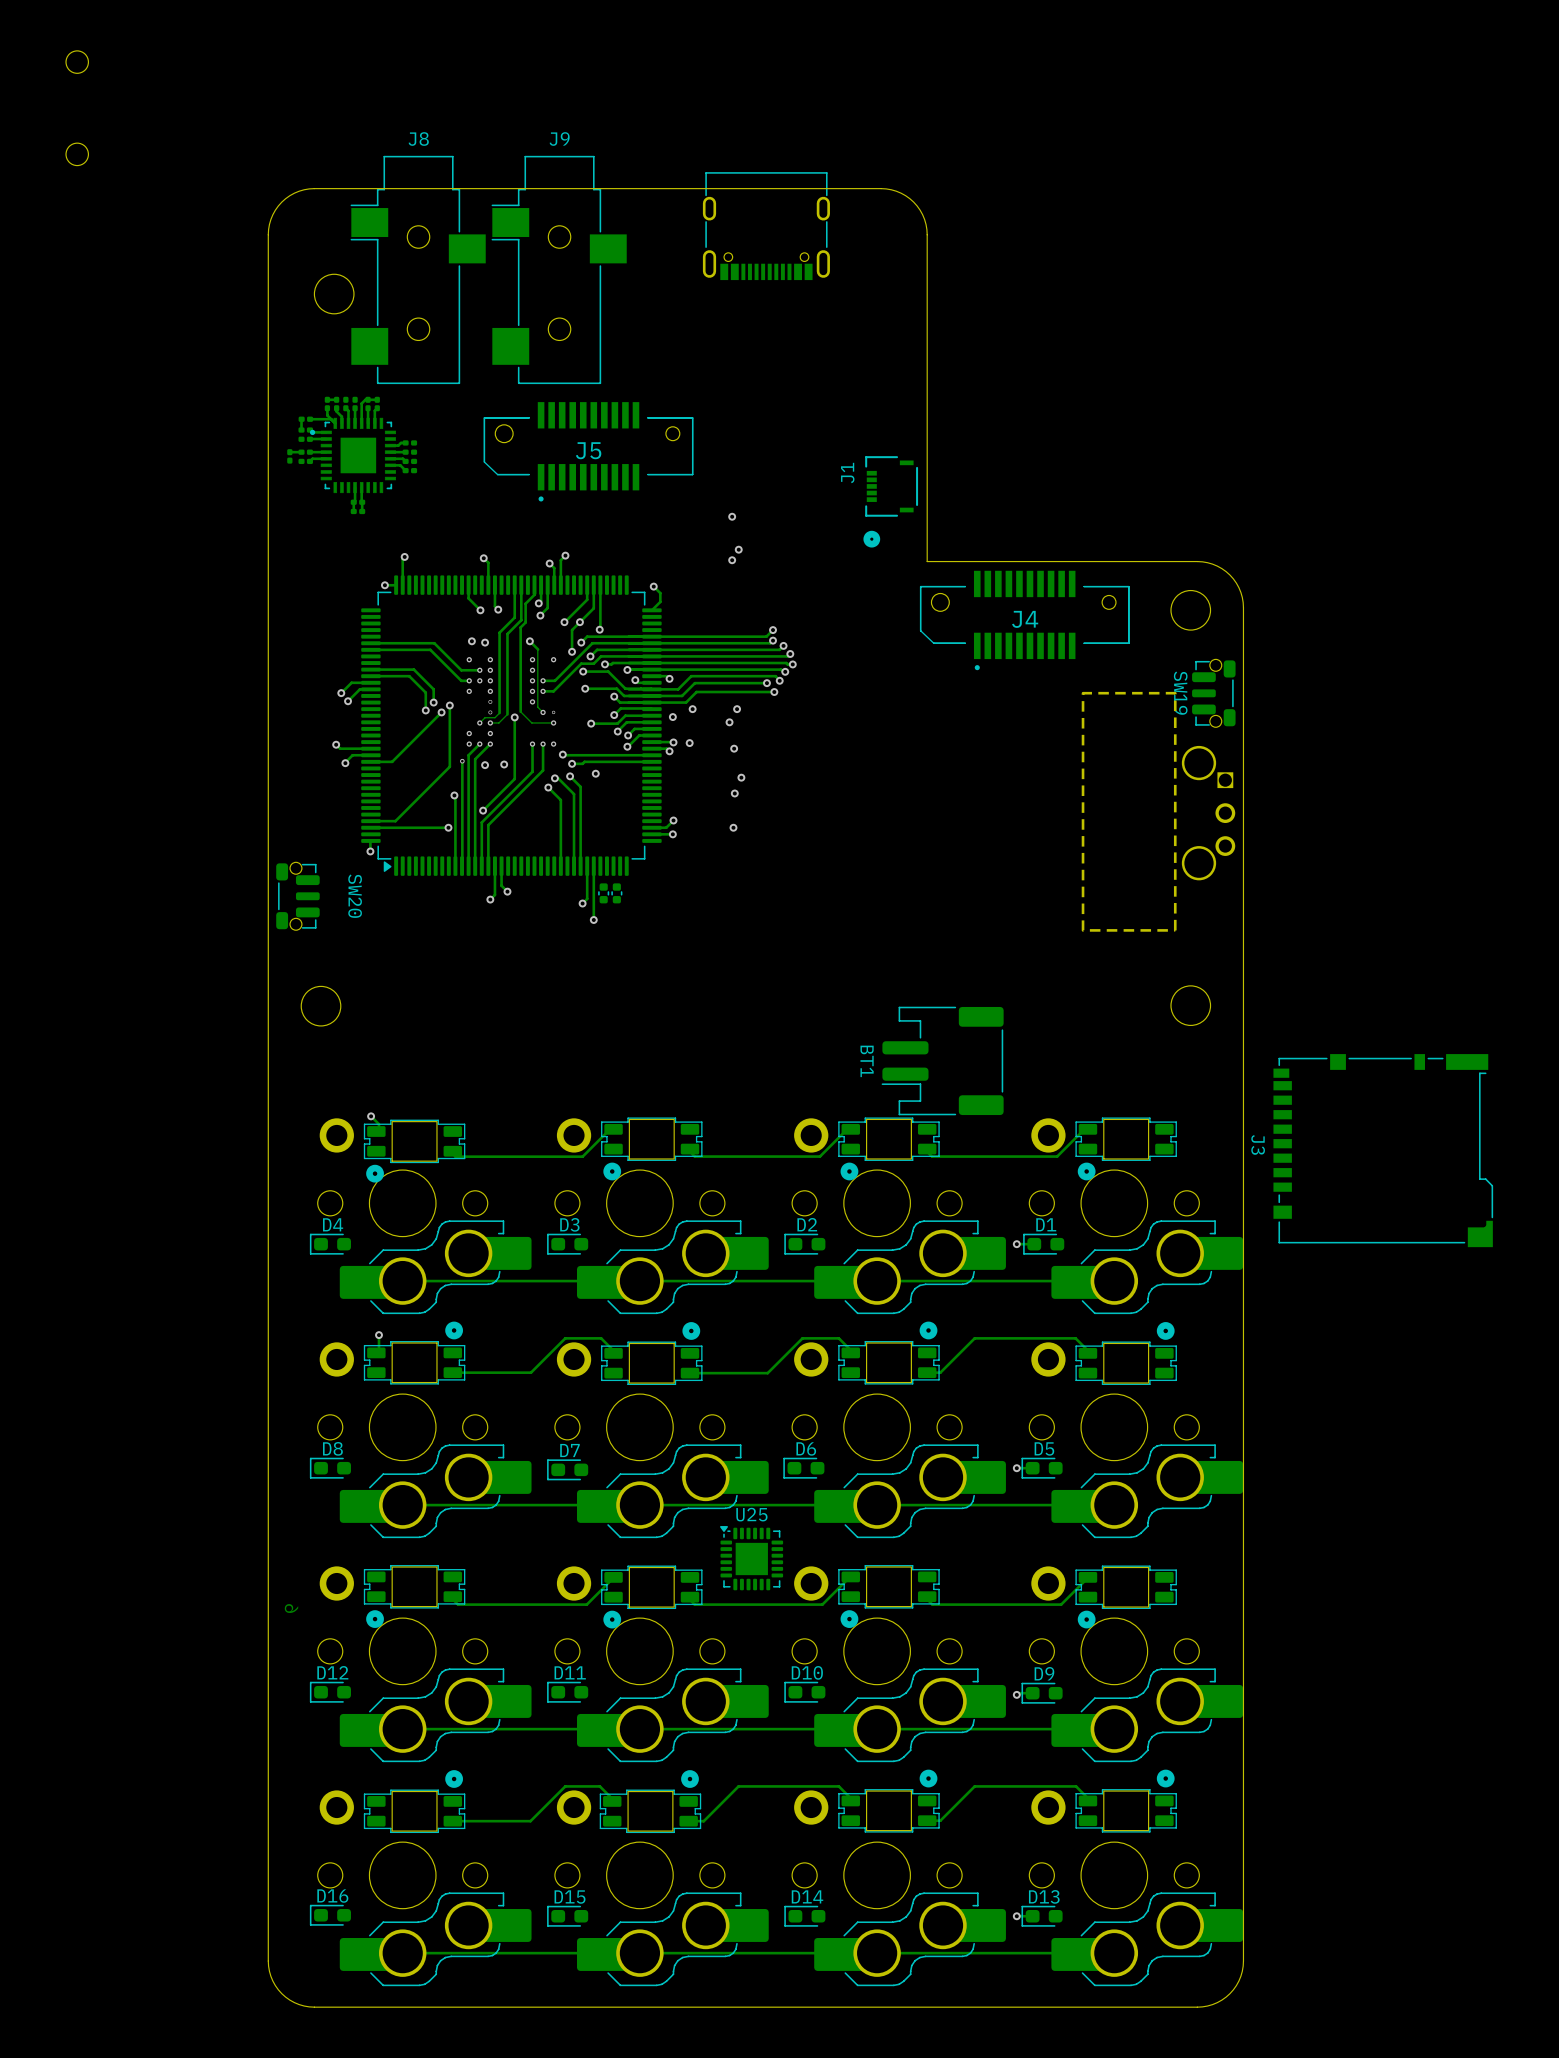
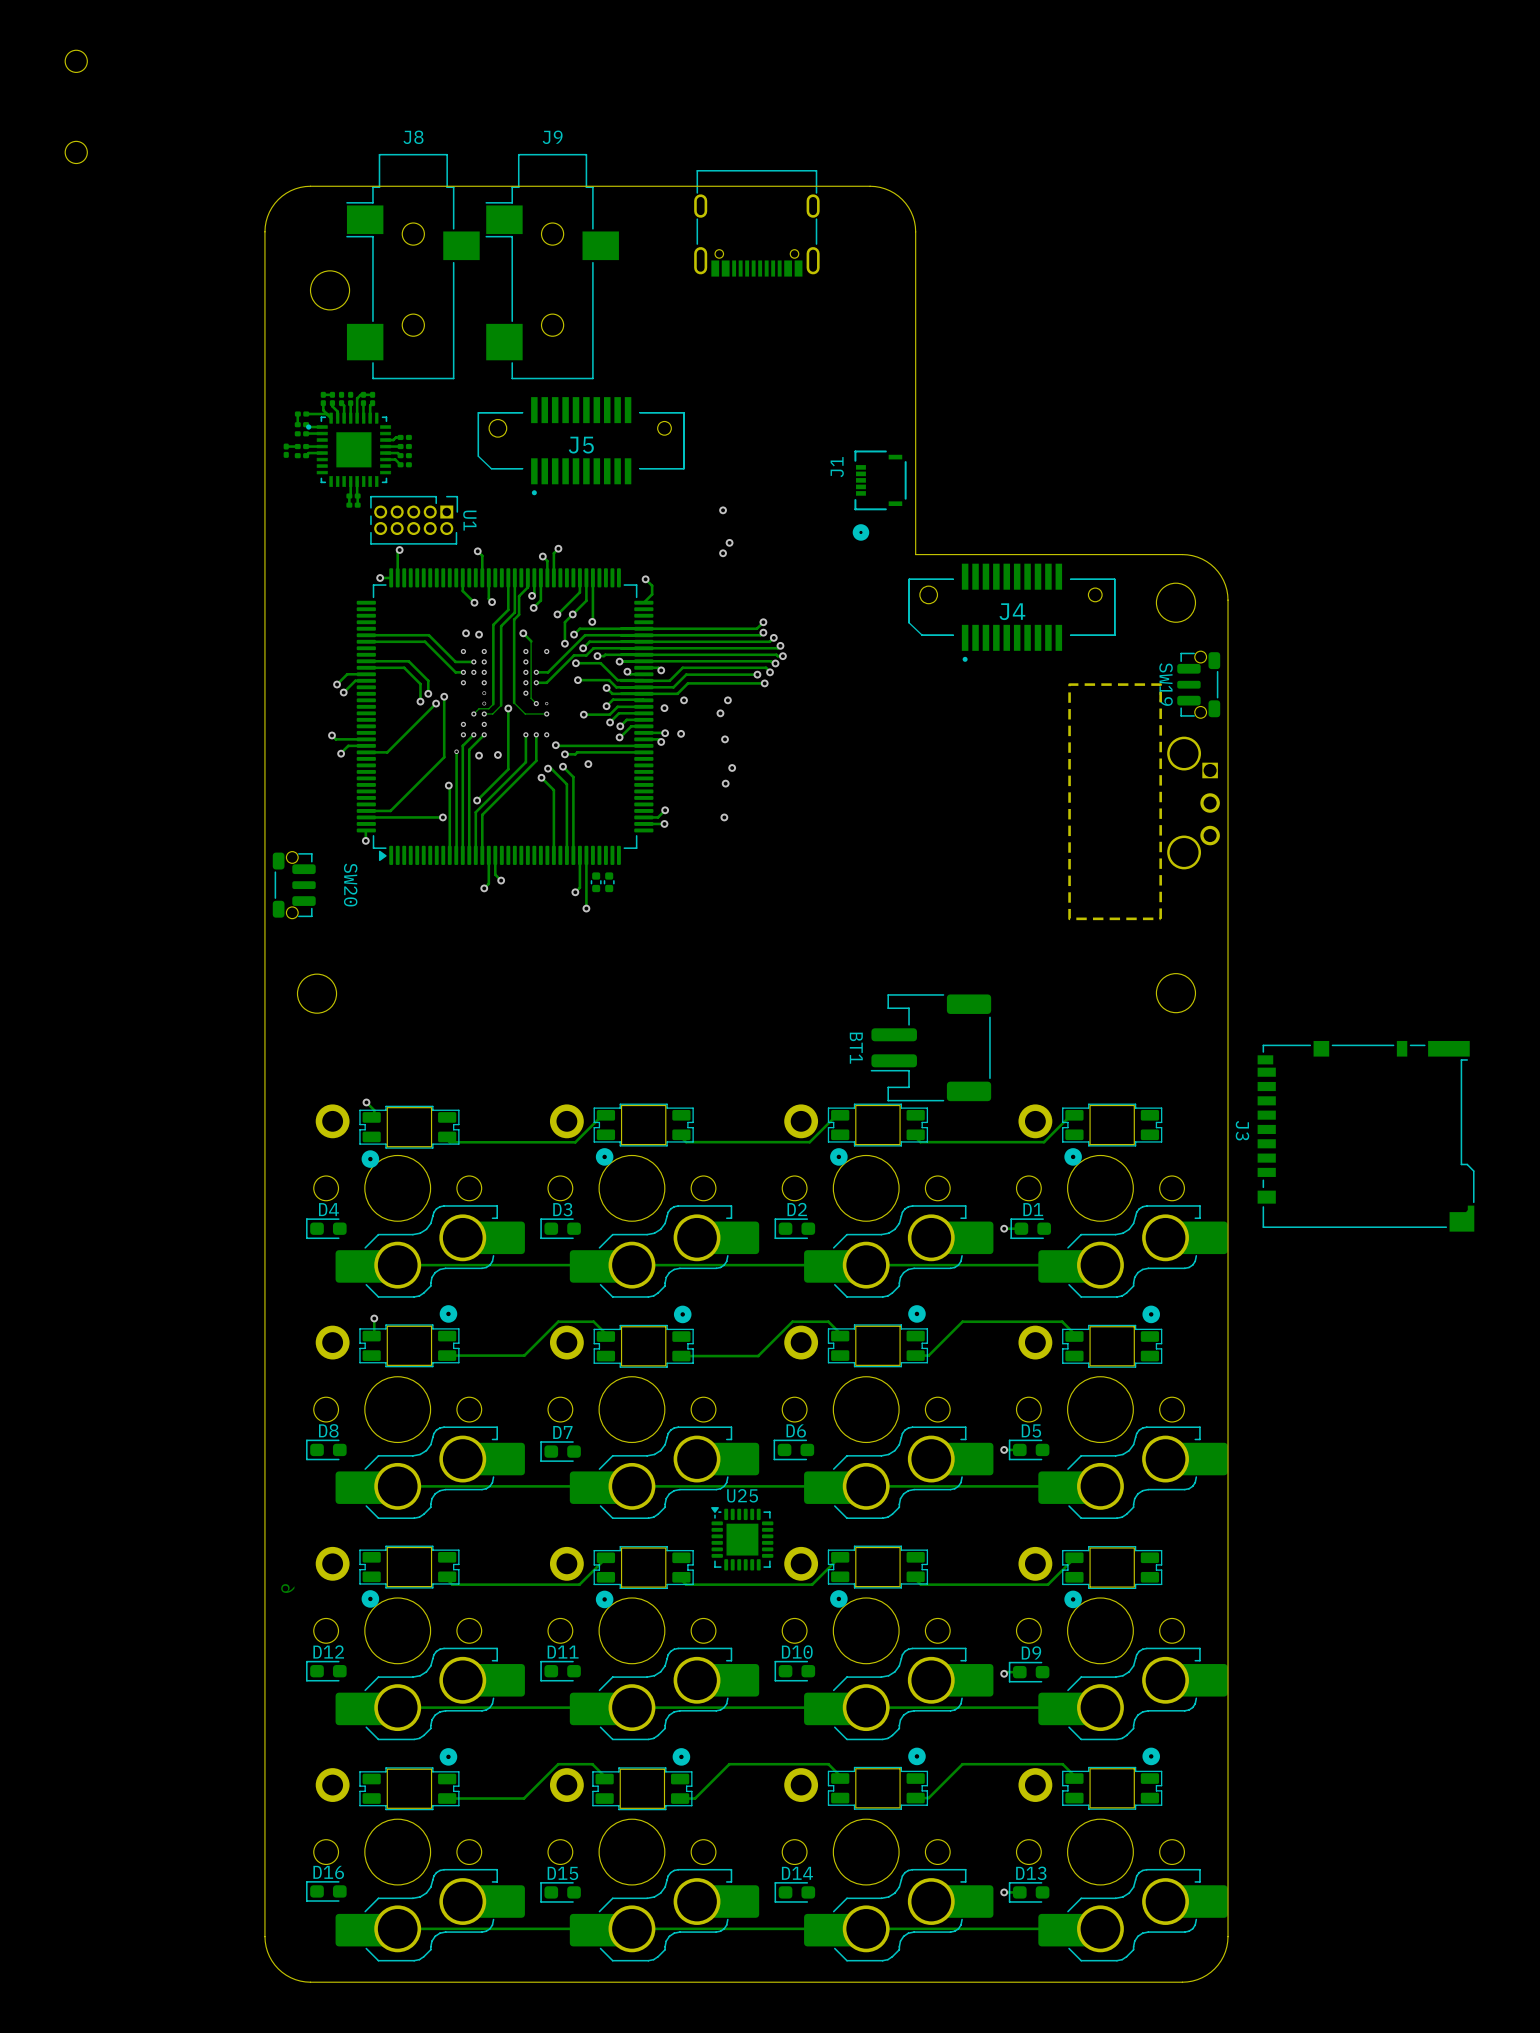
U1: none -> (414, 520)

